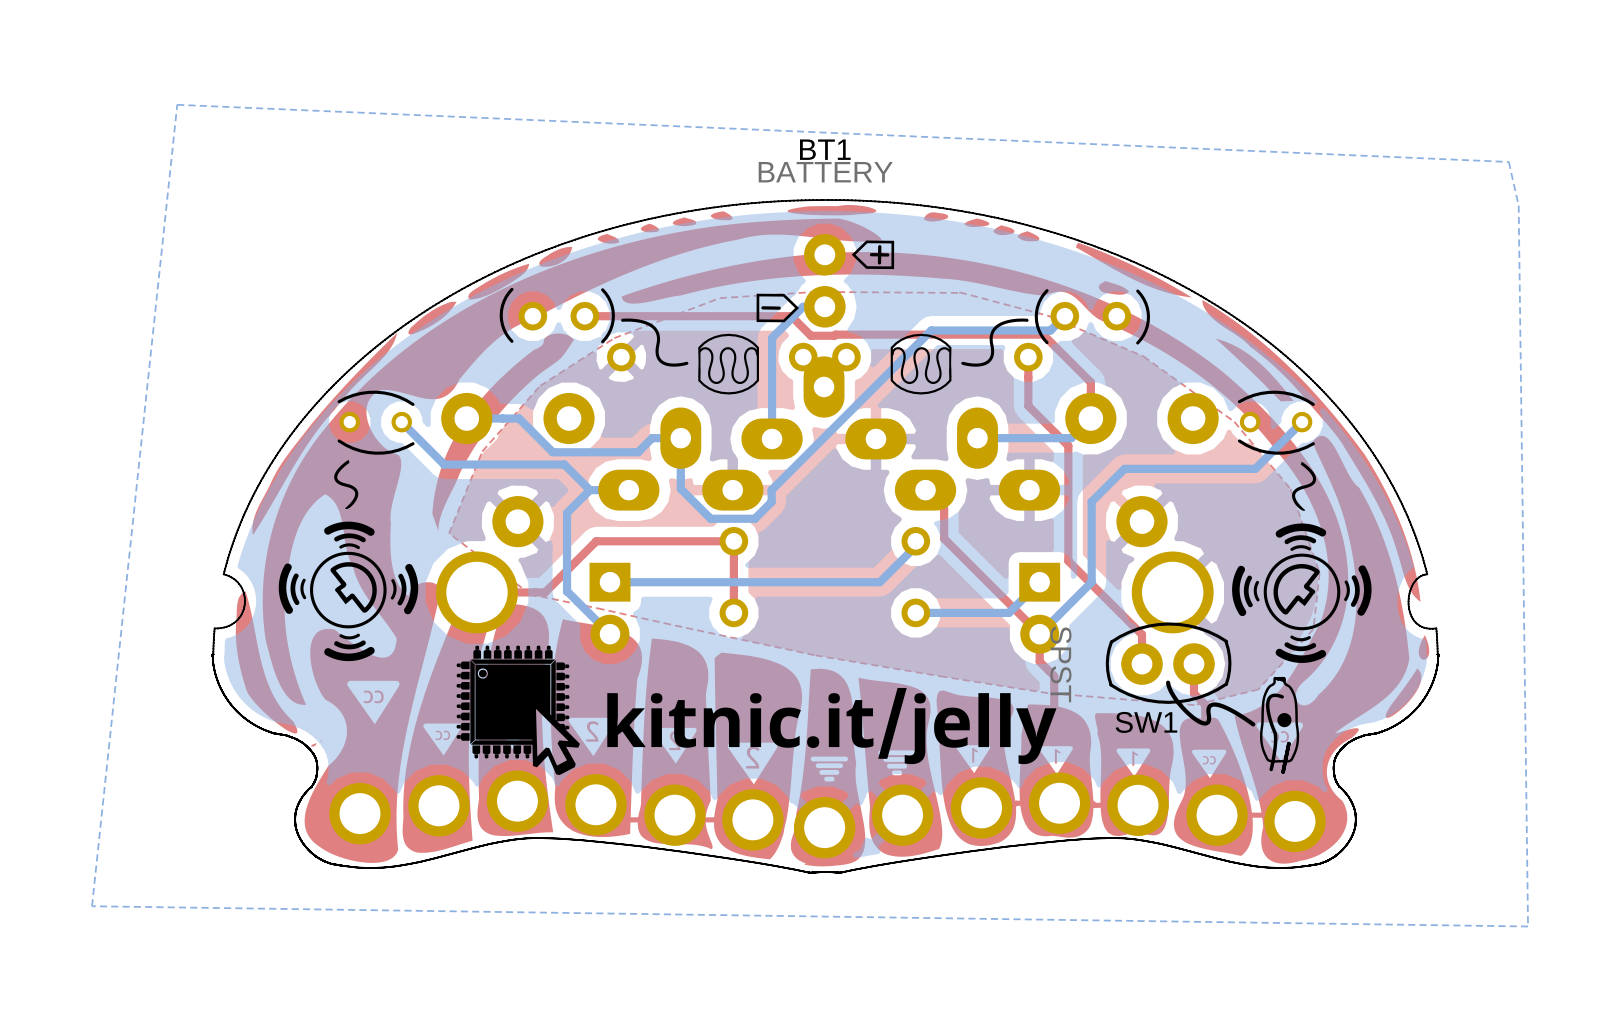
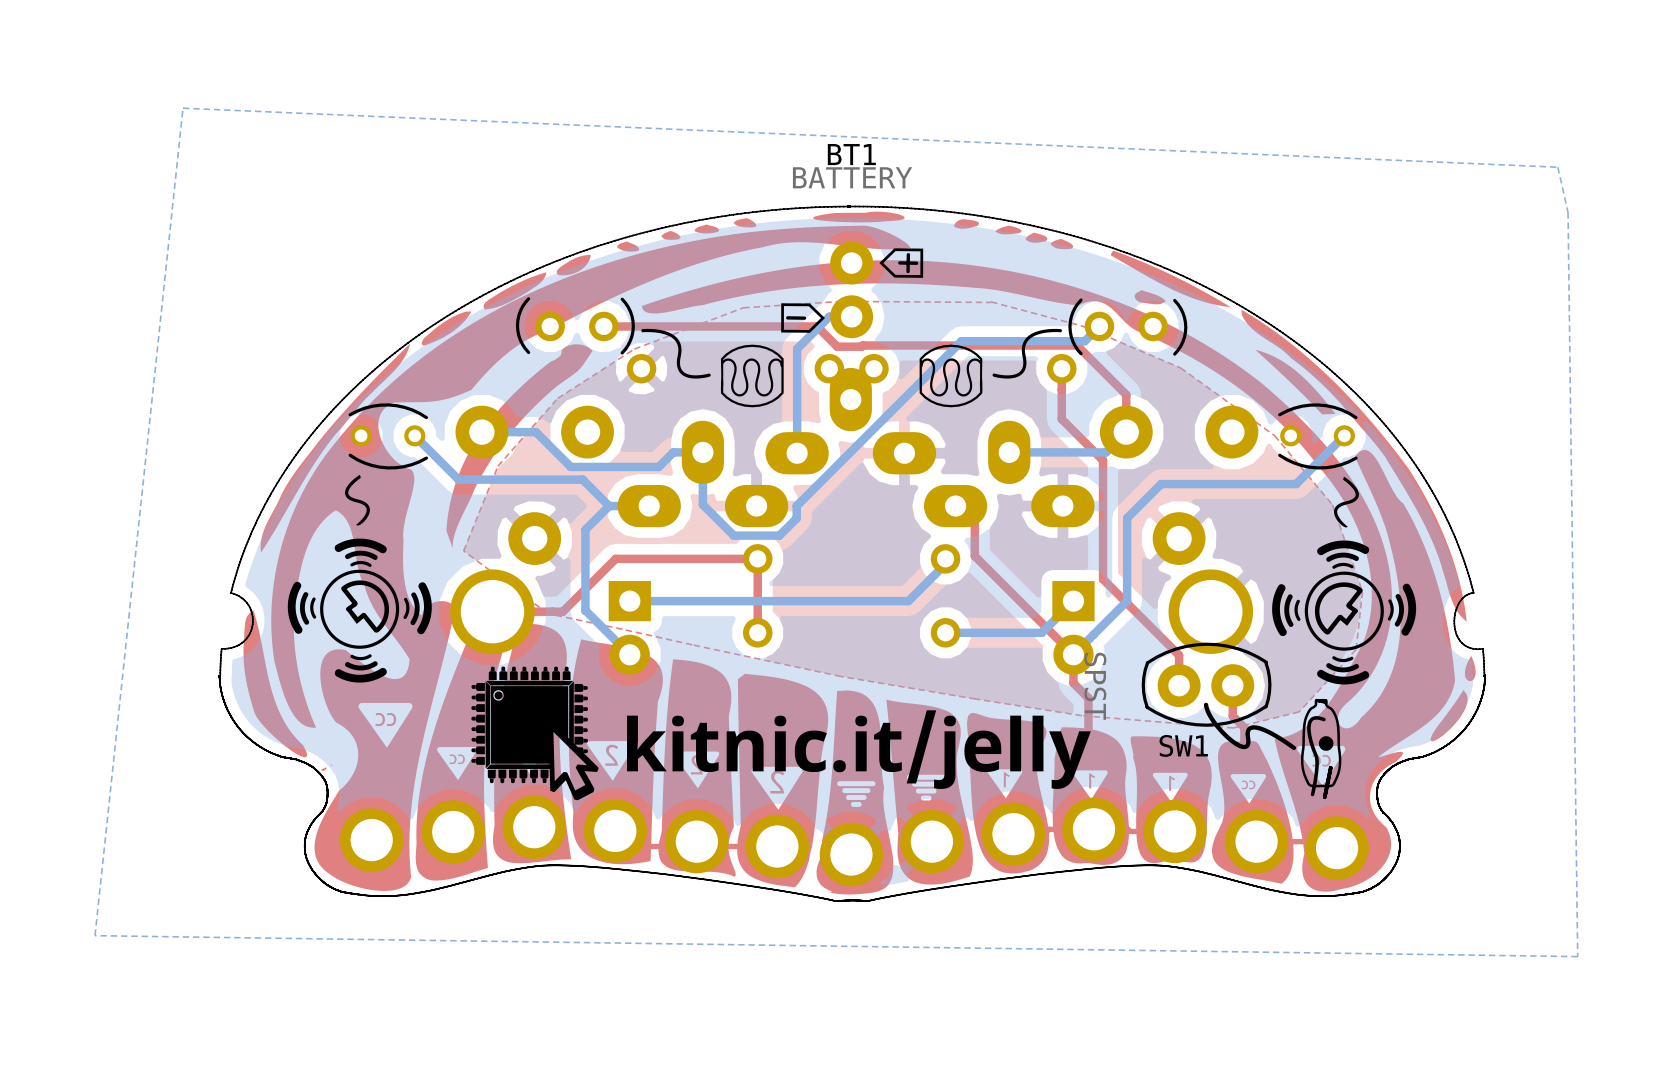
drawing shape: [211, 199, 1440, 874] -> [218, 205, 1486, 902]

